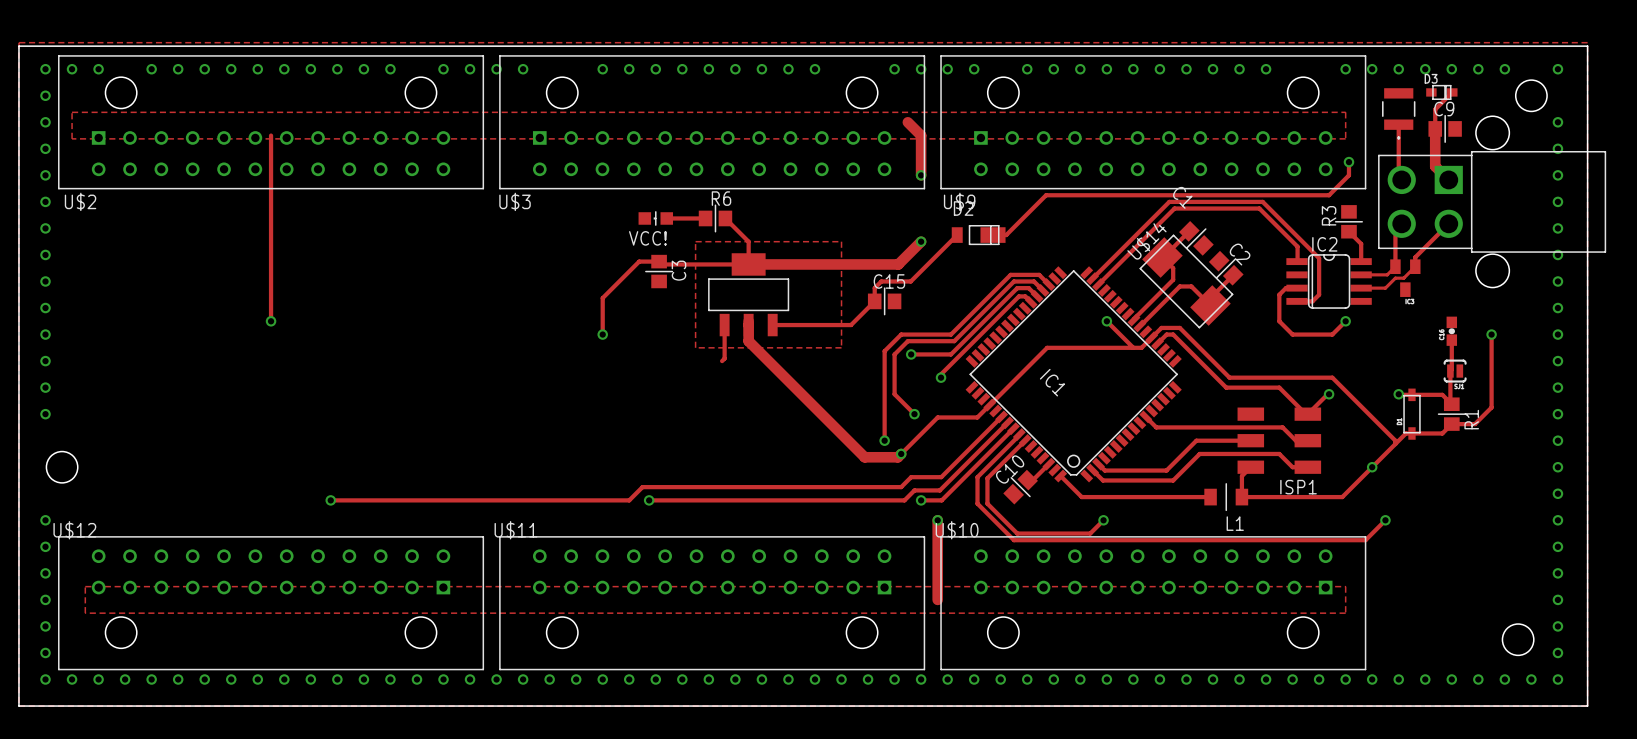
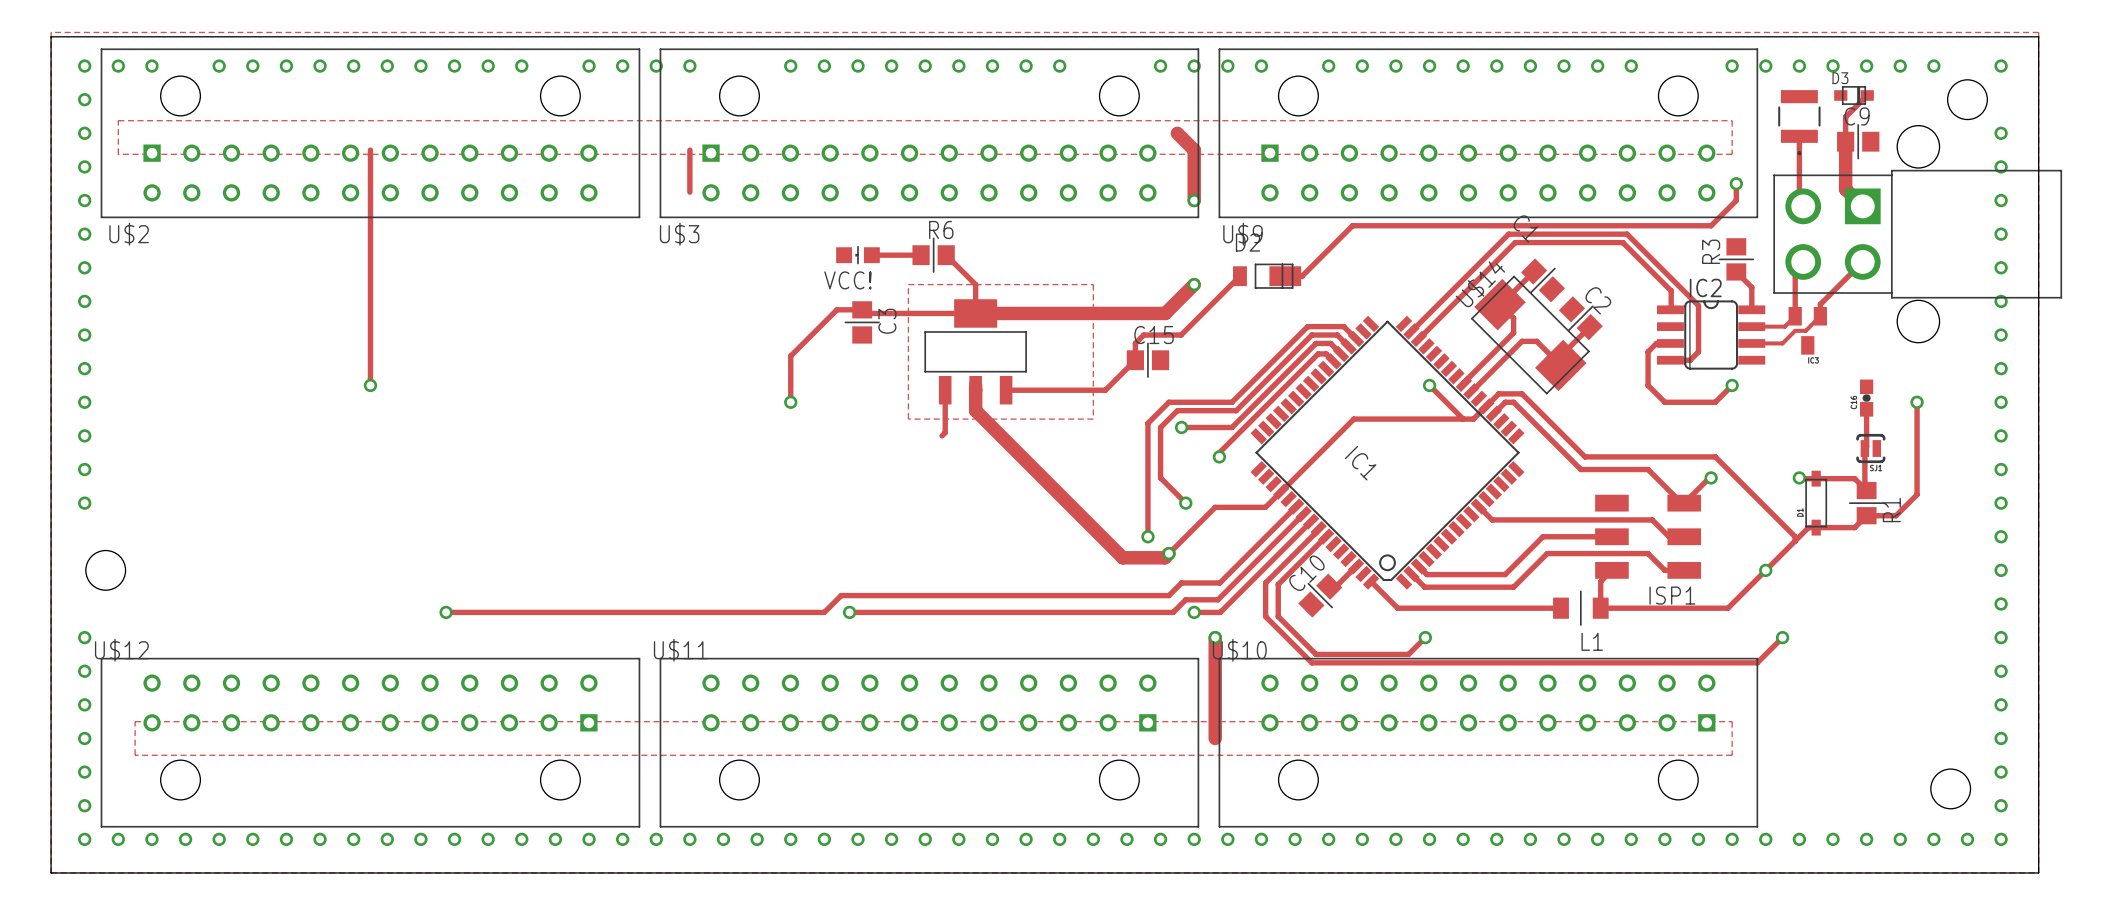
track: none -> (689, 150) (689, 192)

